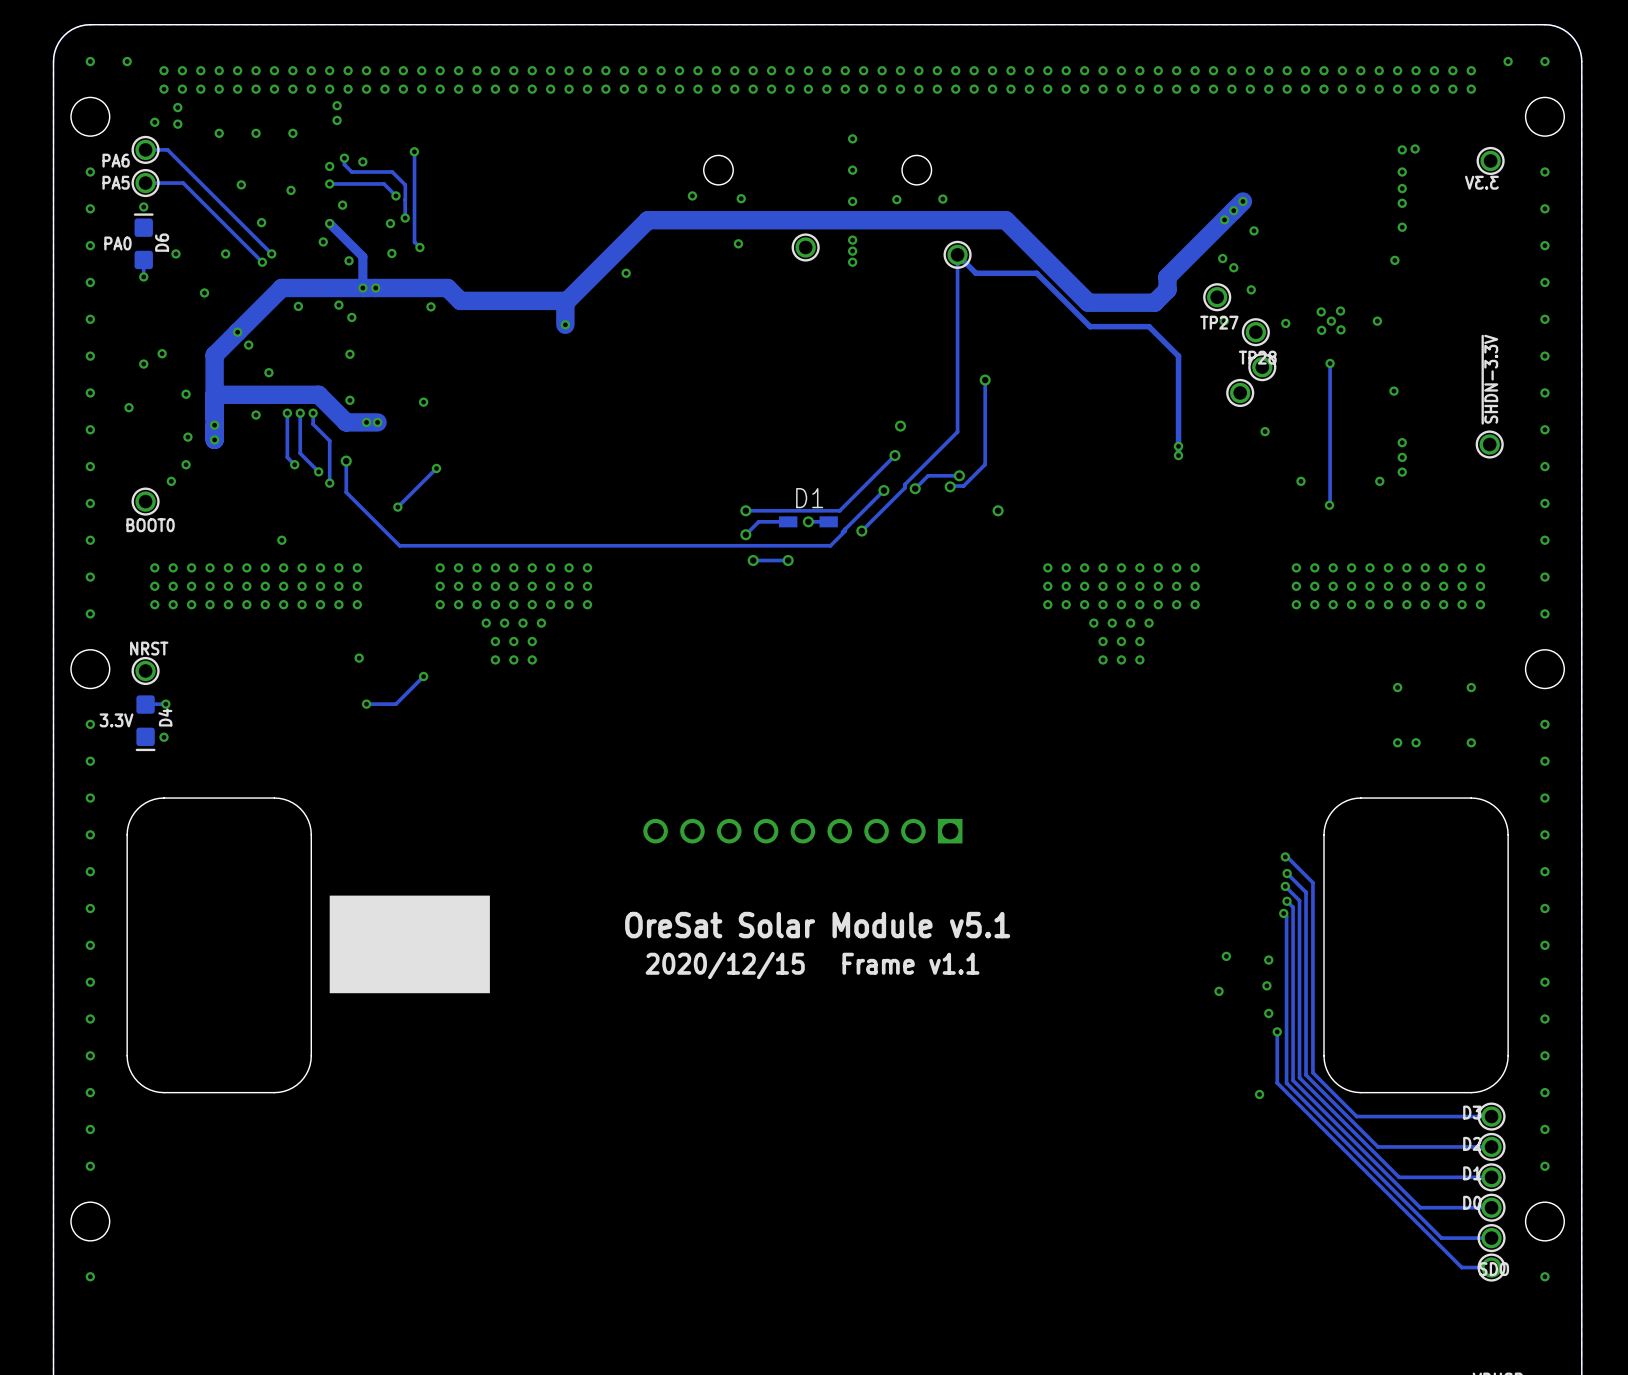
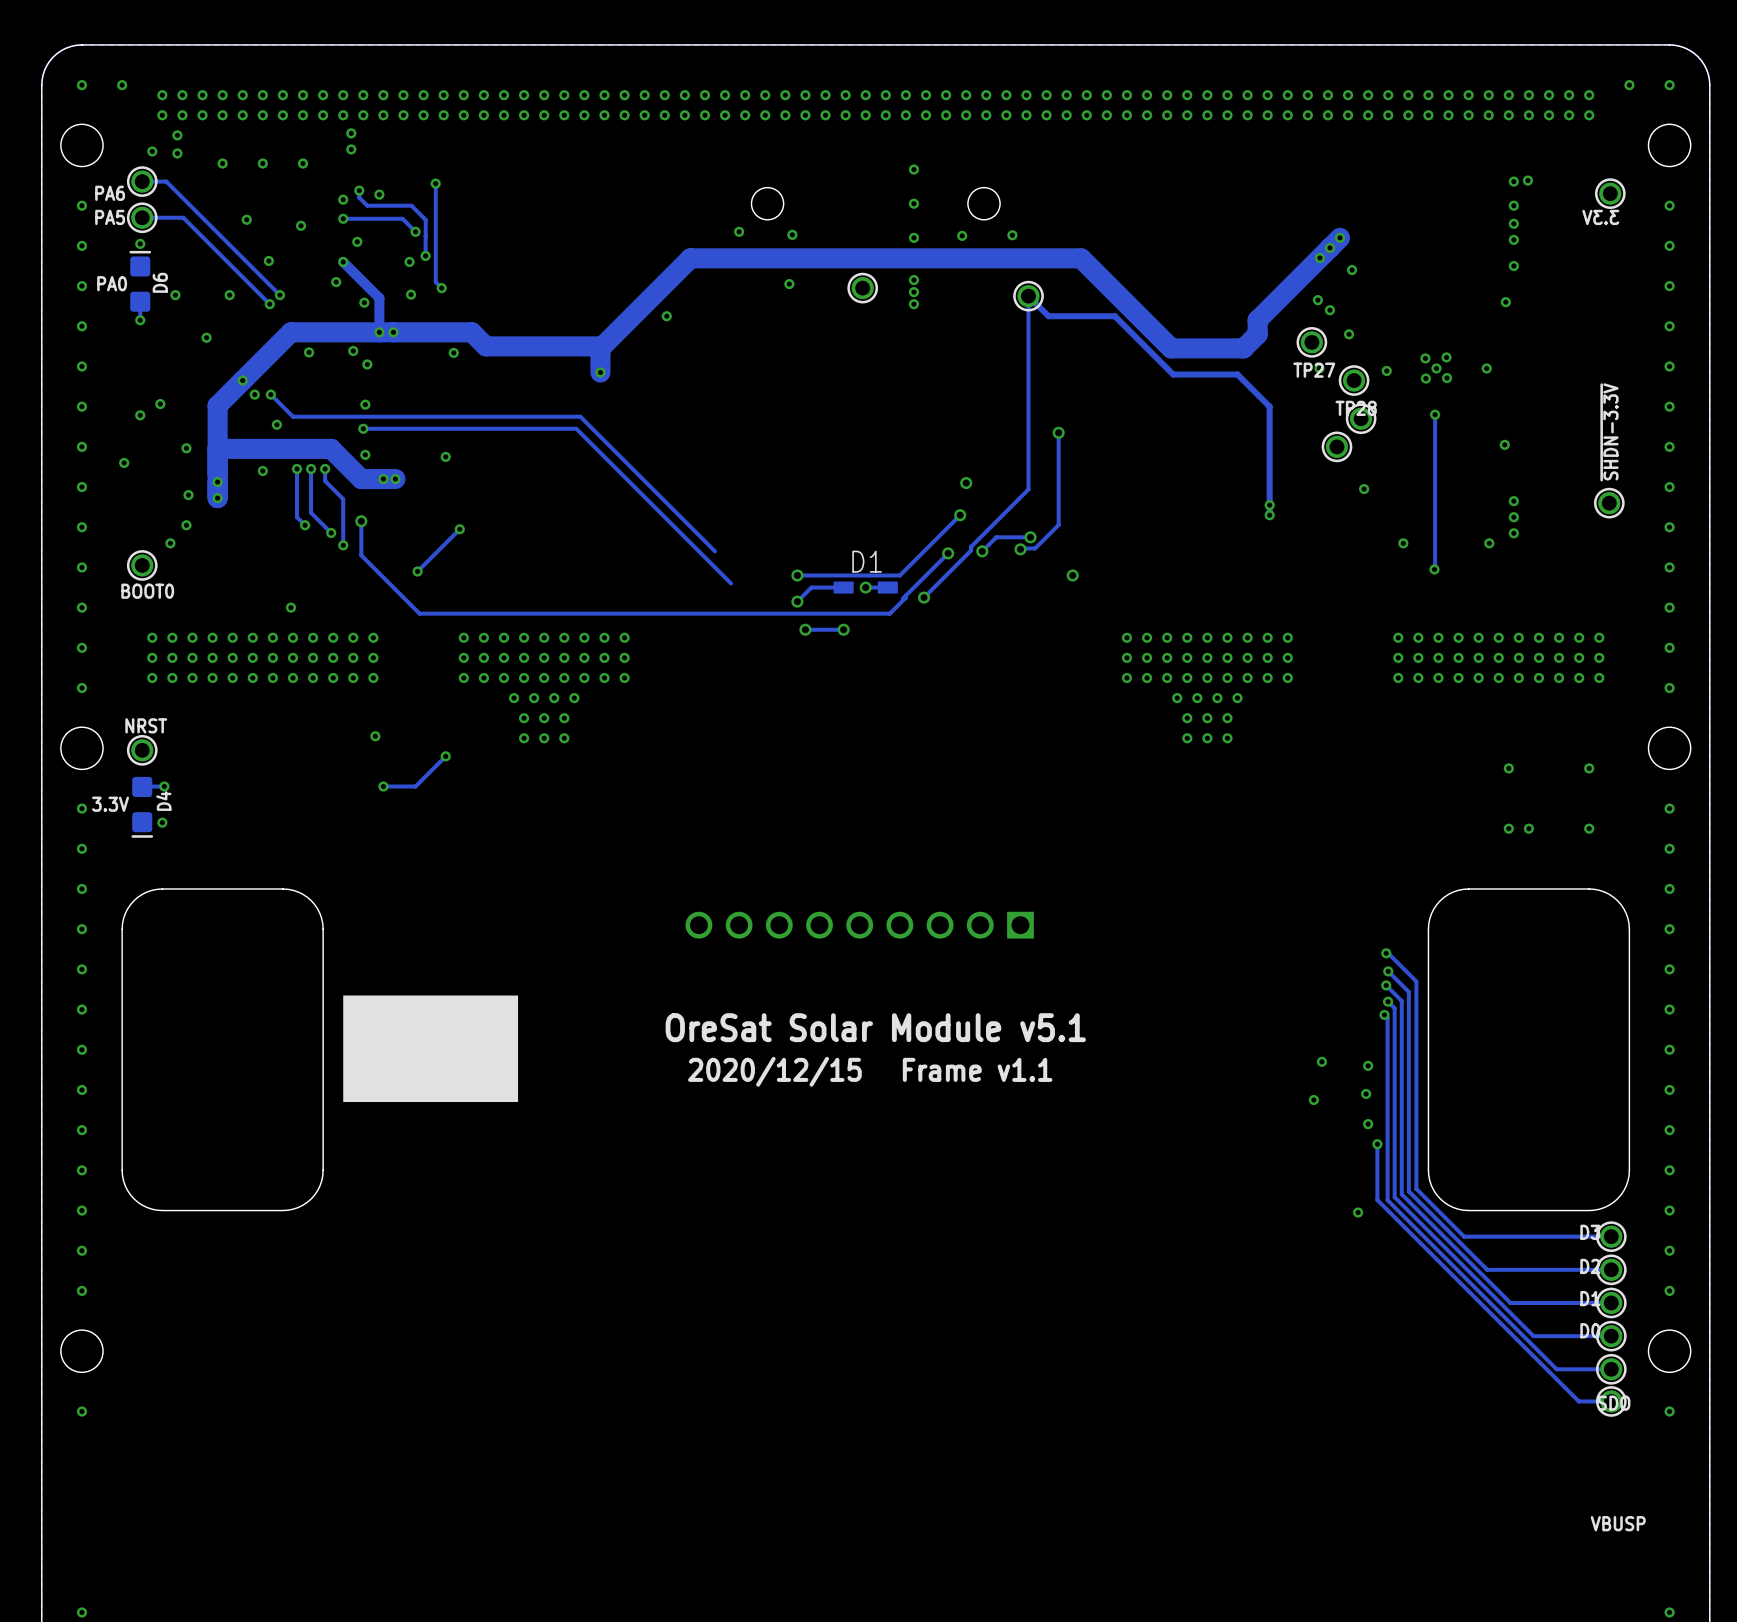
track: none -> (270, 394) (292, 416) (580, 416) (715, 551)
via: none -> (270, 394)
track: none -> (363, 428) (576, 428) (731, 583)
via: none -> (363, 428)

